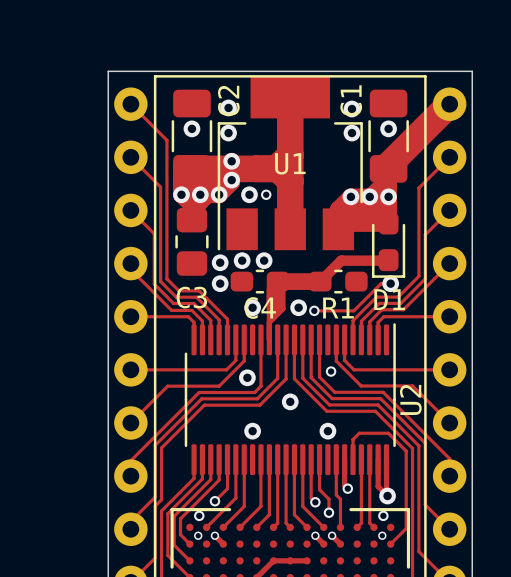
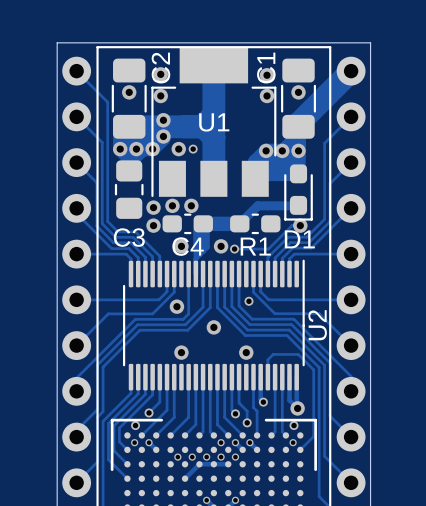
via: none -> (221, 442)
via: none -> (177, 457)
via: none -> (192, 457)
via: none -> (206, 457)
via: none -> (221, 457)
via: none -> (235, 457)

